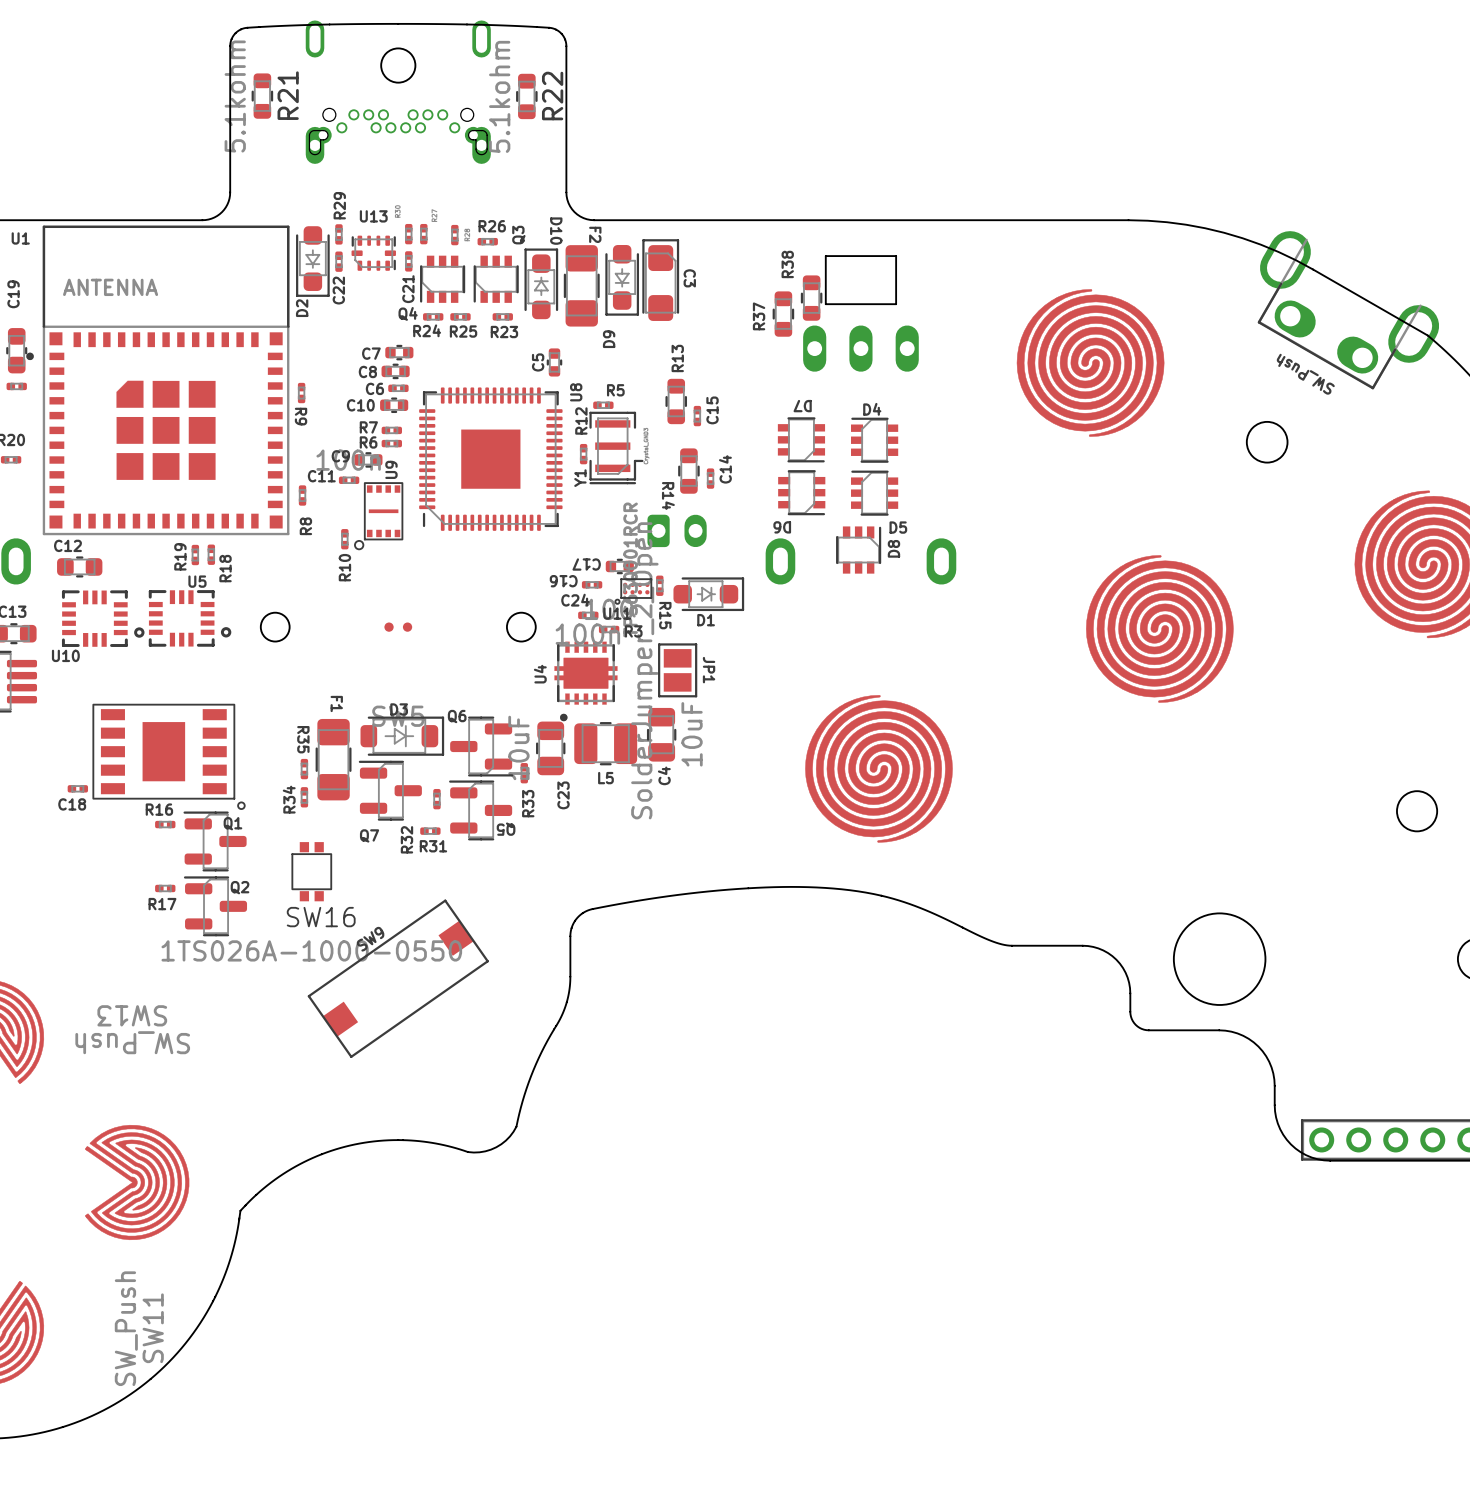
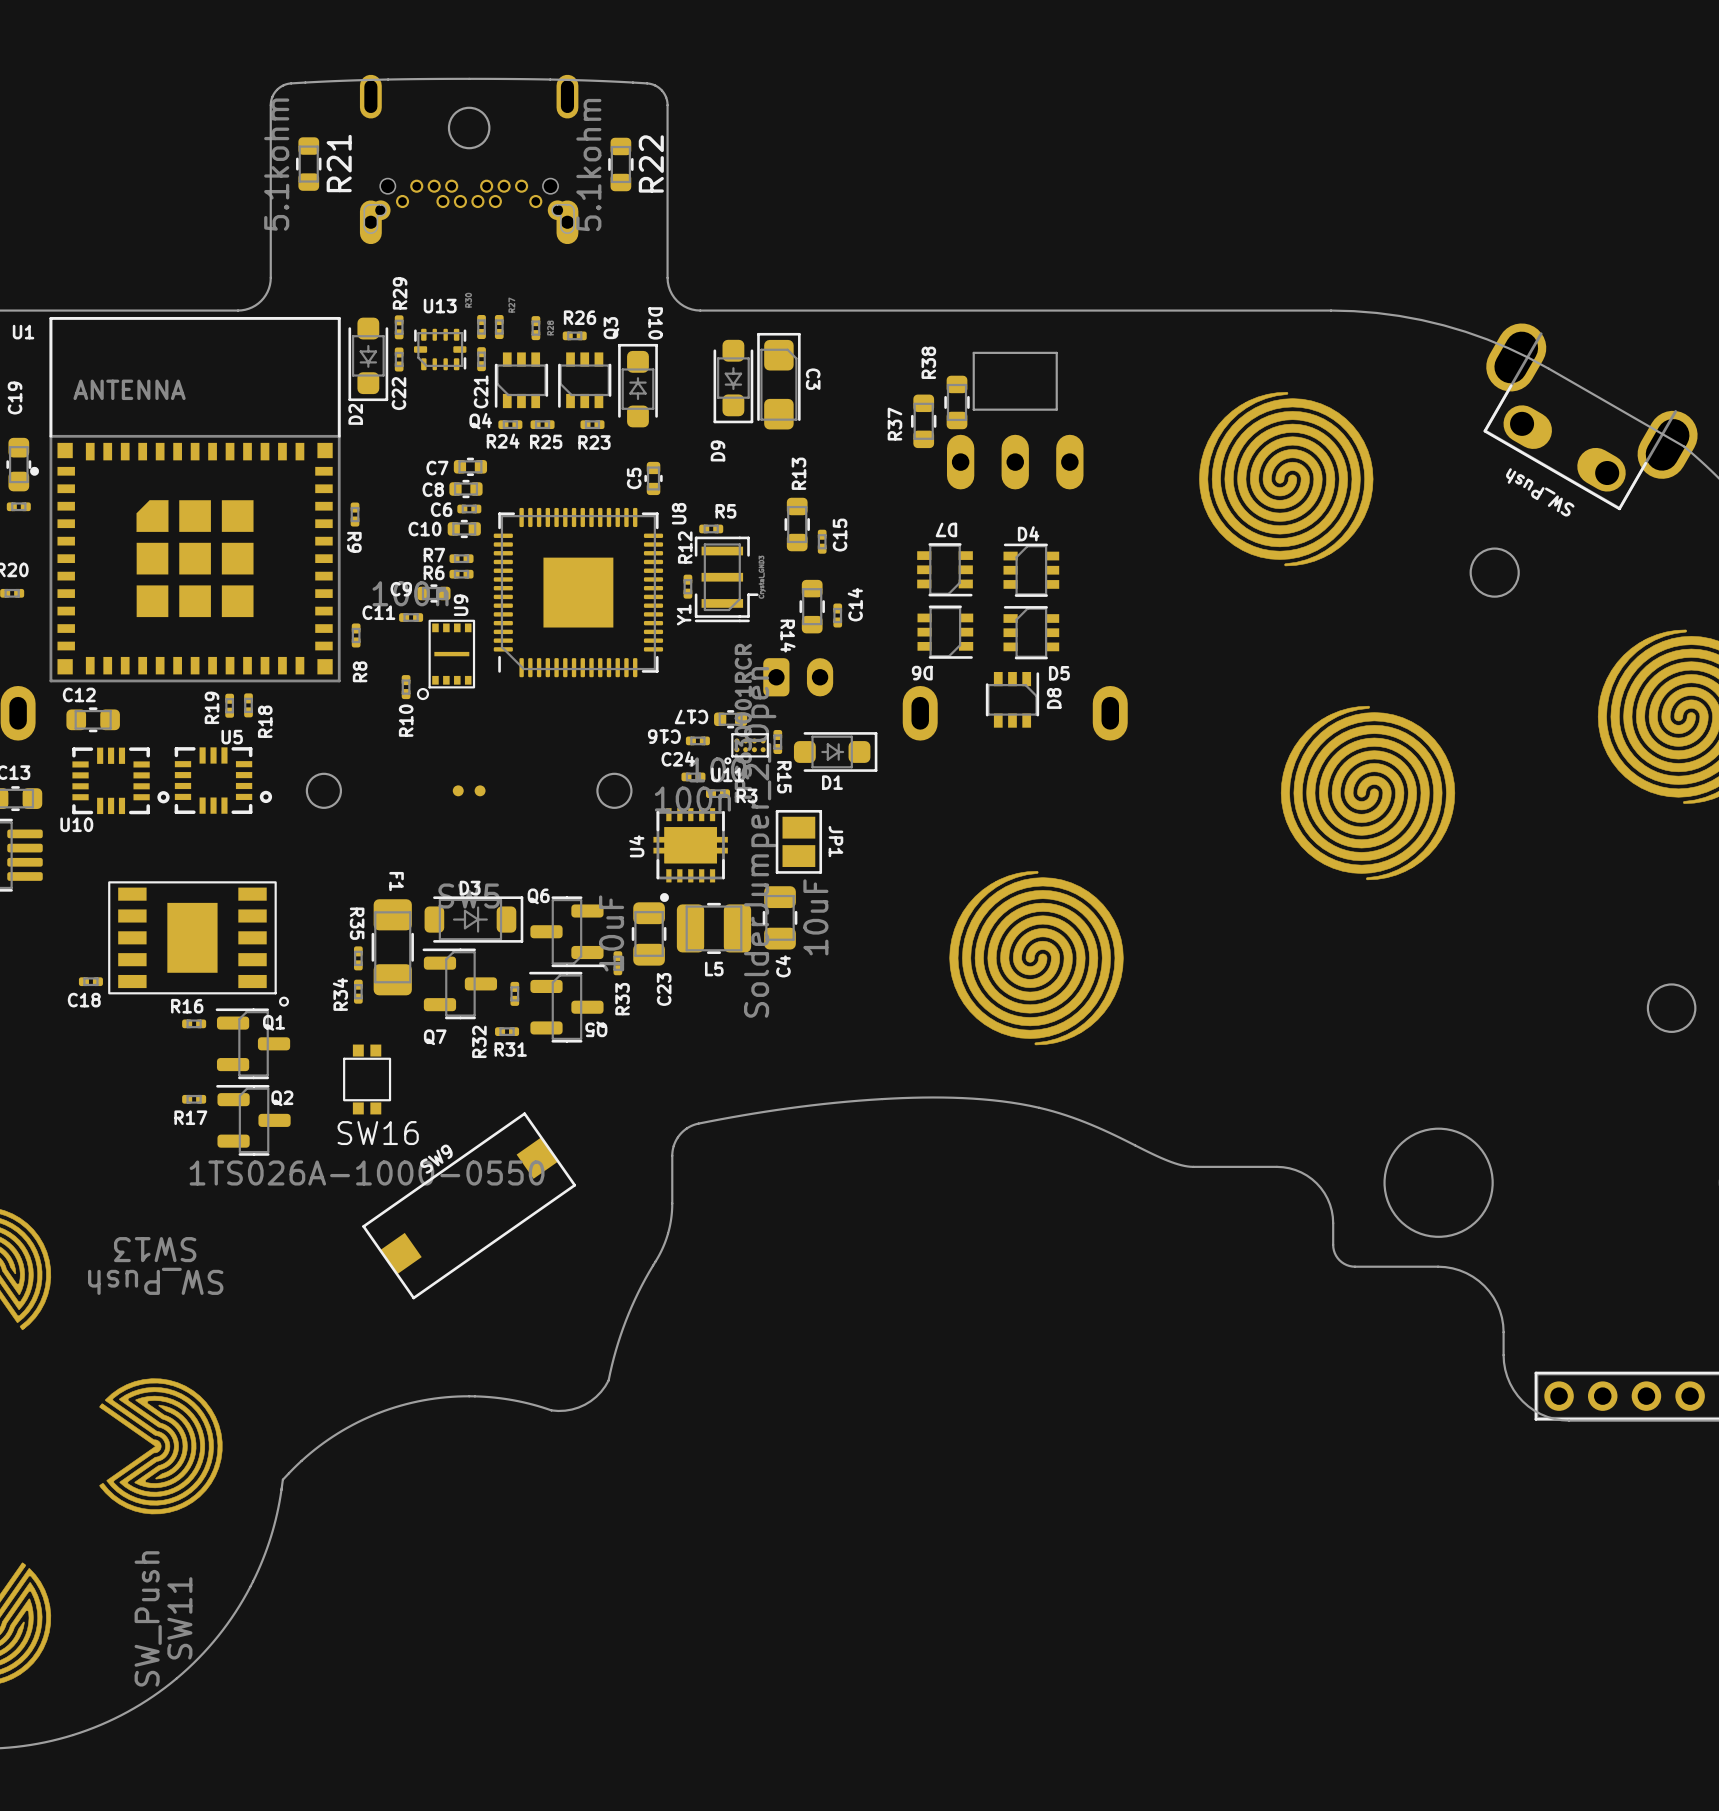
F2: (581, 285) -> none

